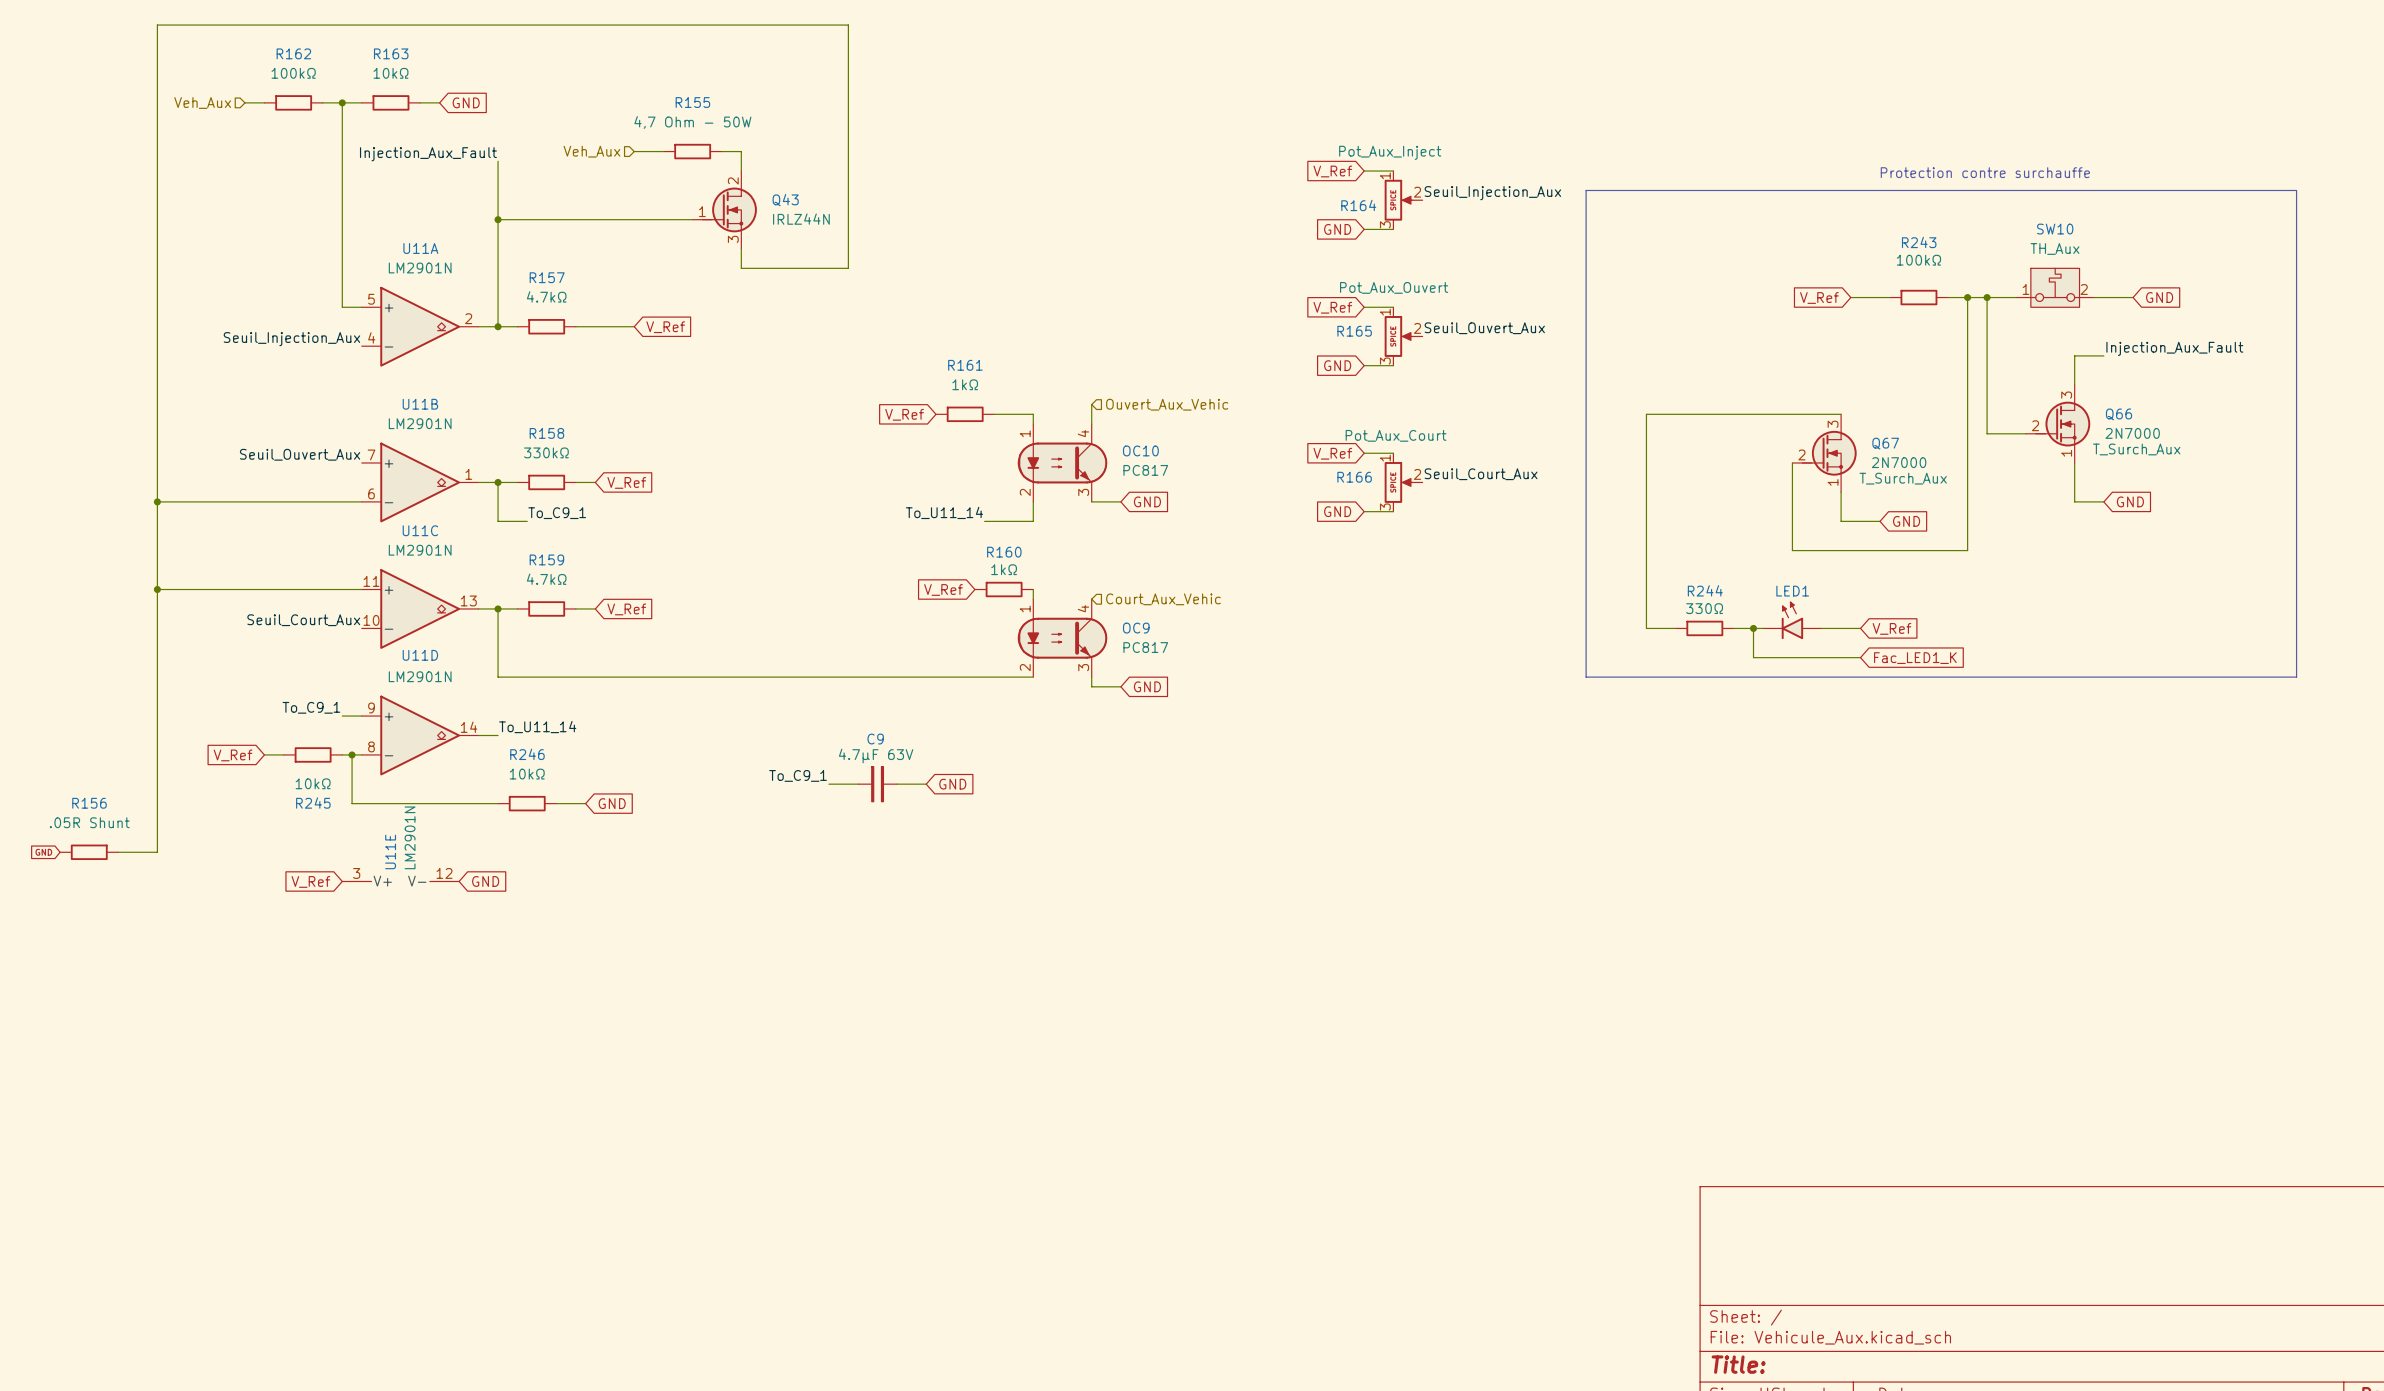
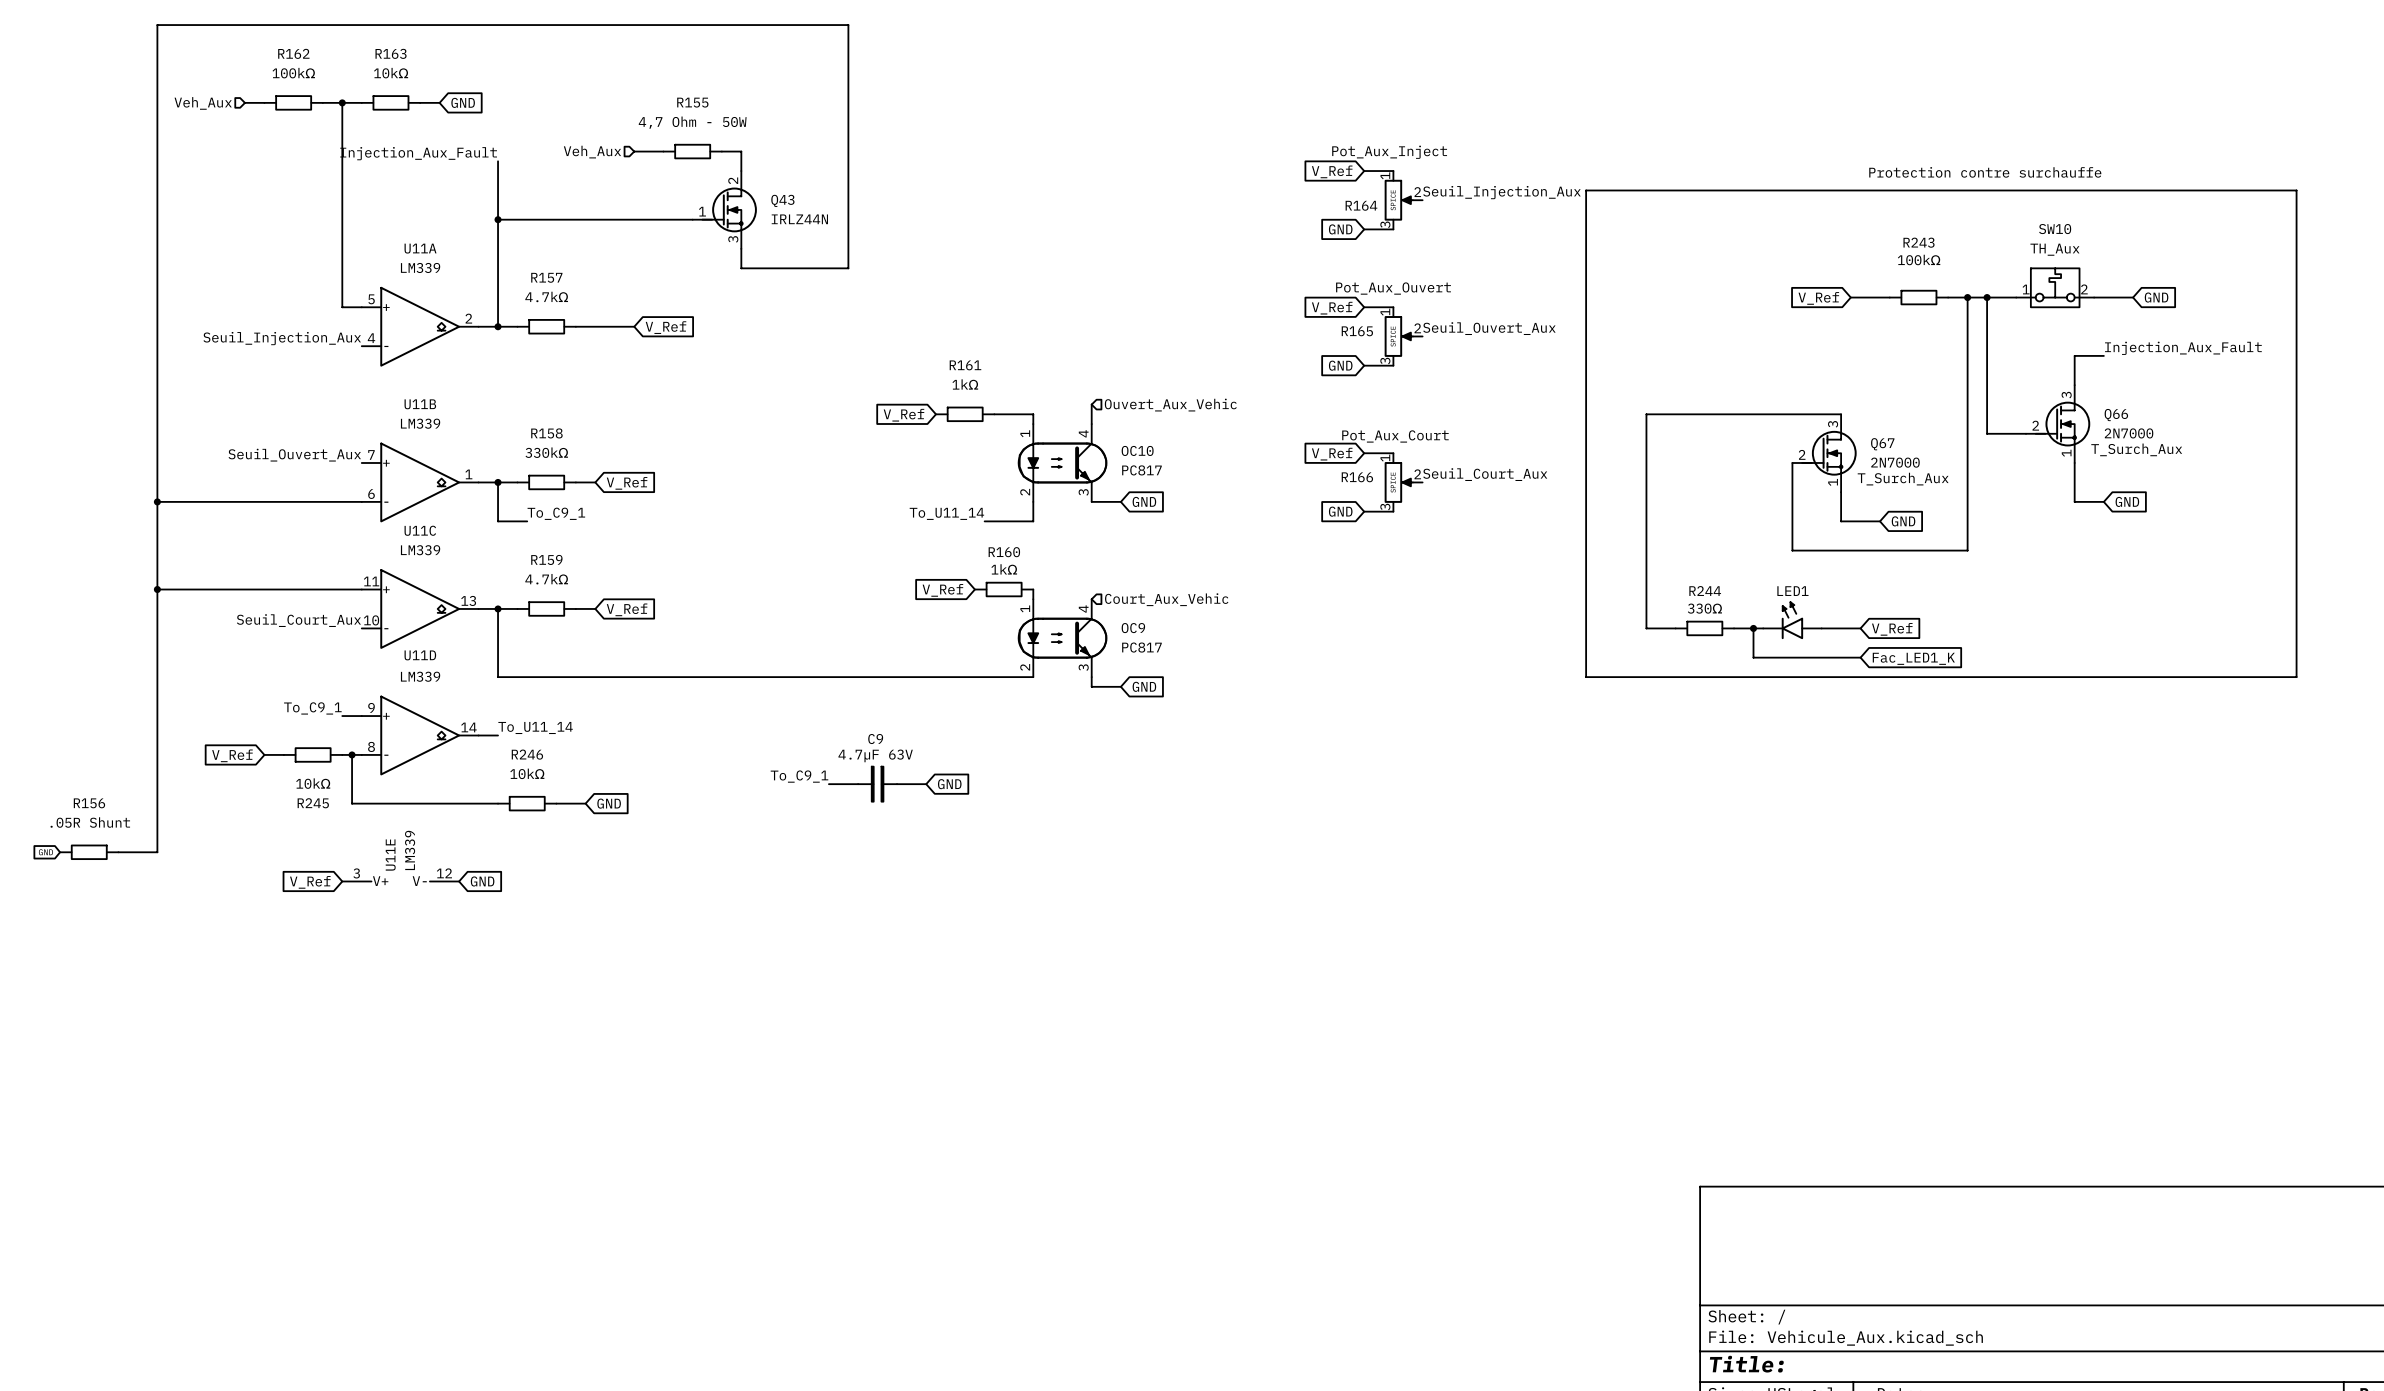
U11A value: LM2901N (420, 267) -> LM339 (420, 267)
U11B value: LM2901N (420, 423) -> LM339 (420, 423)
U11C value: LM2901N (420, 550) -> LM339 (420, 550)
U11D value: LM2901N (420, 676) -> LM339 (420, 676)
U11E value: LM2901N (410, 837) -> LM339 (410, 850)

